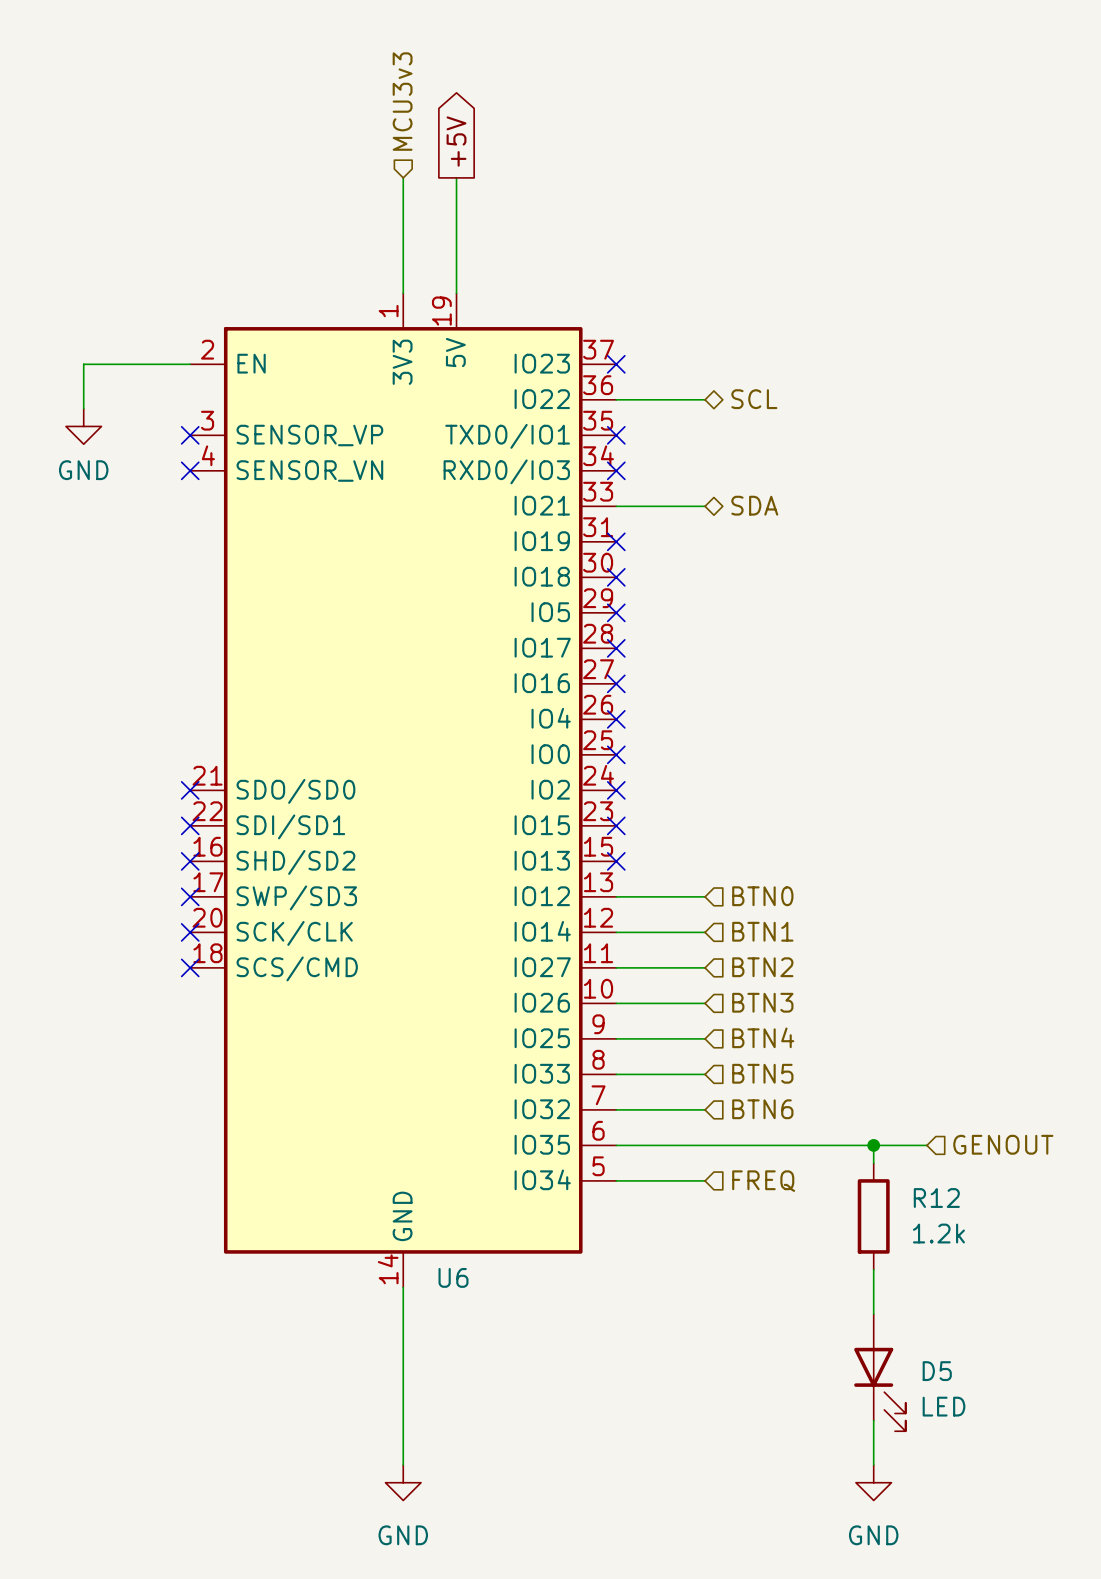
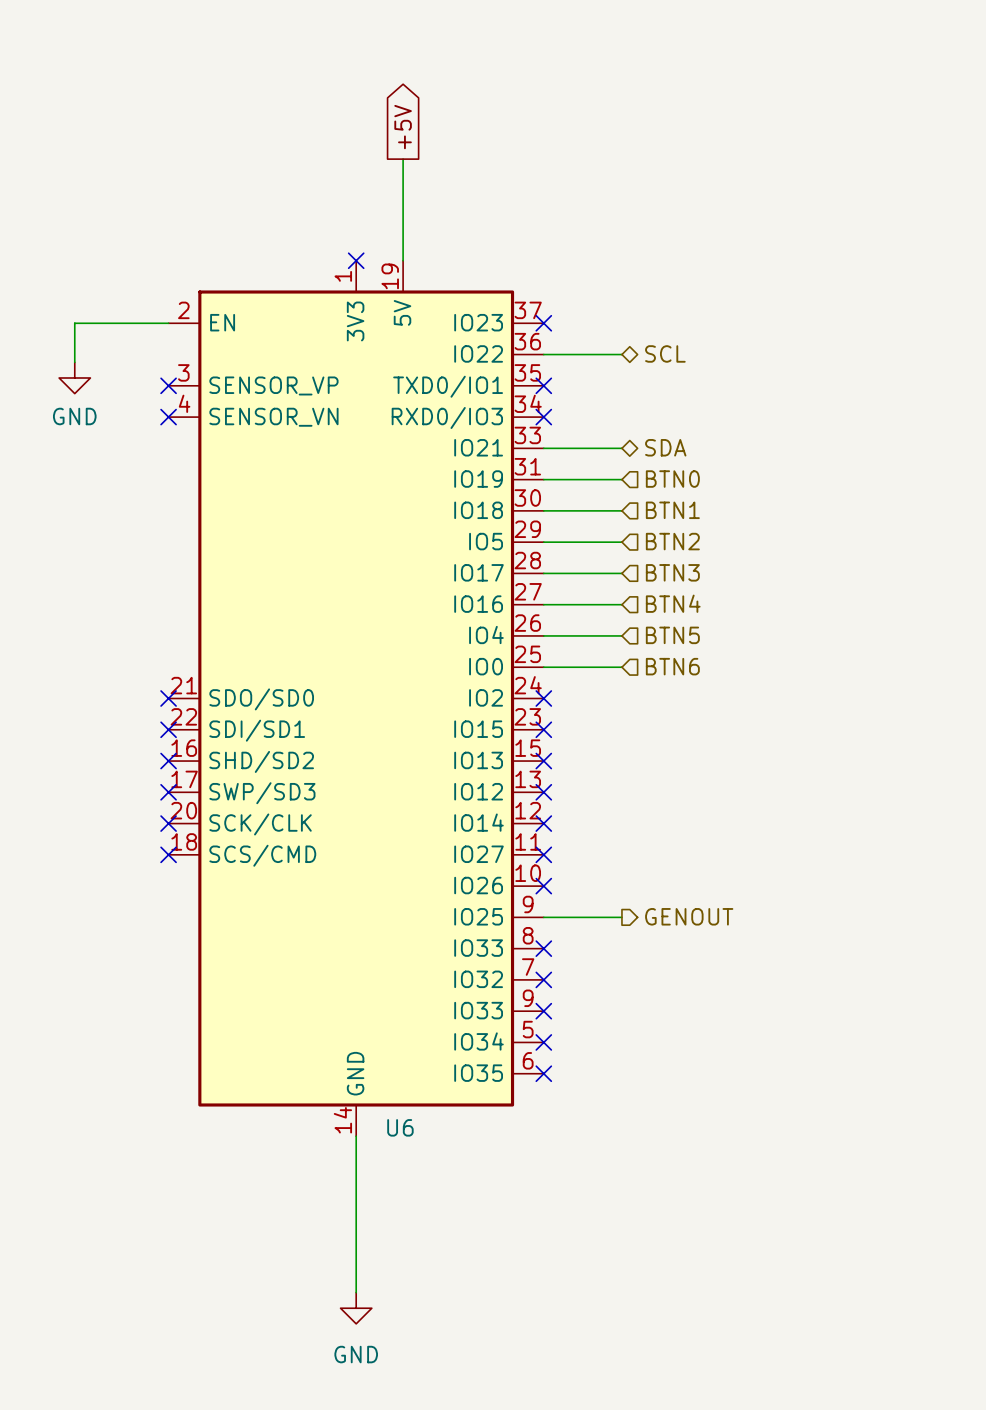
hierarchical label: MCU3v3 (402, 101) -> none
wire: (403, 177) (403, 293) -> none
U6 symbol: [190, 293, 617, 1288] -> [168, 260, 544, 1137]
no-connect mark: none -> (356, 260)
wire: none -> (543, 479) (621, 479)
no-connect mark: (616, 541) -> none
hierarchical label: none -> BTN0 (672, 479)
hierarchical label: none -> BTN1 (672, 510)
no-connect mark: (616, 577) -> none
no-connect mark: (616, 612) -> none
hierarchical label: none -> BTN2 (672, 541)
hierarchical label: none -> BTN3 (672, 572)
no-connect mark: (616, 648) -> none
hierarchical label: none -> BTN4 (673, 603)
no-connect mark: (616, 683) -> none
hierarchical label: none -> BTN5 (672, 635)
wire: none -> (543, 635) (621, 635)
no-connect mark: (616, 719) -> none
no-connect mark: (616, 754) -> none
hierarchical label: none -> BTN6 (672, 666)
wire: (616, 896) (705, 896) -> (543, 510) (621, 510)
no-connect mark: none -> (543, 792)
hierarchical label: BTN0 (762, 896) -> none
hierarchical label: BTN1 (762, 931) -> none
wire: (616, 932) (705, 932) -> (543, 542) (621, 542)
no-connect mark: none -> (543, 823)
wire: (616, 967) (705, 967) -> (543, 573) (621, 573)
no-connect mark: none -> (543, 854)
hierarchical label: BTN2 (762, 967) -> none
hierarchical label: BTN3 (762, 1002) -> none
wire: (616, 1003) (705, 1003) -> (543, 604) (621, 604)
no-connect mark: none -> (543, 886)
hierarchical label shape: input (763, 1037) -> output (689, 916)
hierarchical label: BTN4 (763, 1037) -> GENOUT (689, 916)
hierarchical label: BTN5 (762, 1073) -> none
wire: (616, 1074) (705, 1074) -> (543, 667) (621, 667)
no-connect mark: none -> (543, 948)
wire: (616, 1109) (705, 1109) -> none
no-connect mark: none -> (543, 979)
hierarchical label: BTN6 (762, 1109) -> none
hierarchical label: GENOUT (1003, 1144) -> none
wire: (616, 1145) (926, 1145) -> none
no-connect mark: none -> (543, 1011)
wire: (873, 1145) (873, 1163) -> none
junction: (873, 1145) -> none
wire: (616, 1180) (705, 1180) -> none
no-connect mark: none -> (543, 1042)
hierarchical label: FREQ (763, 1181) -> none
no-connect mark: none -> (543, 1073)
R12: 1.2k (873, 1216) -> none
wire: (873, 1269) (873, 1314) -> none
D5: LED (879, 1372) -> none
wire: (873, 1420) (873, 1464) -> none
power symbol: GND (873, 1482) -> none

